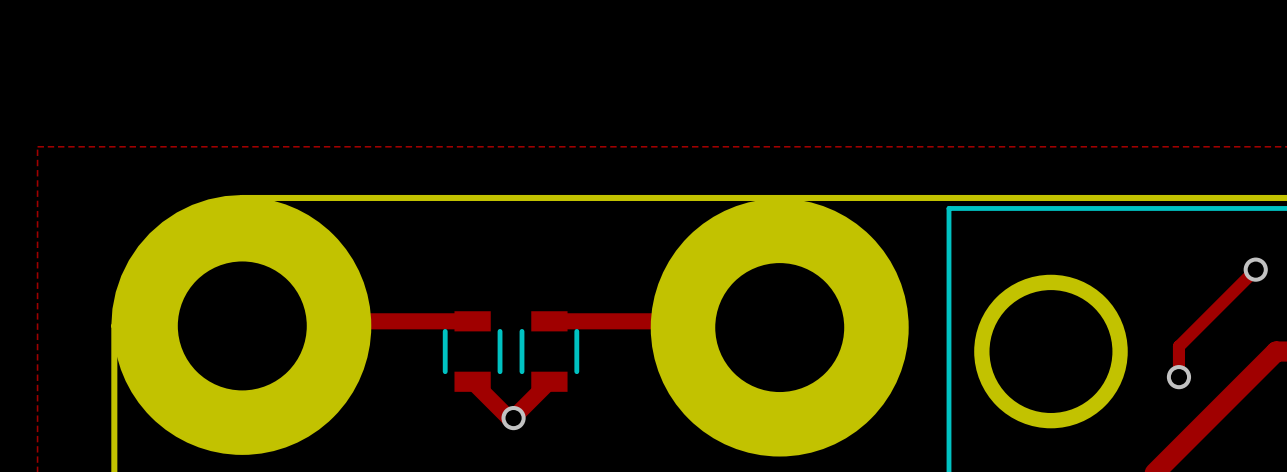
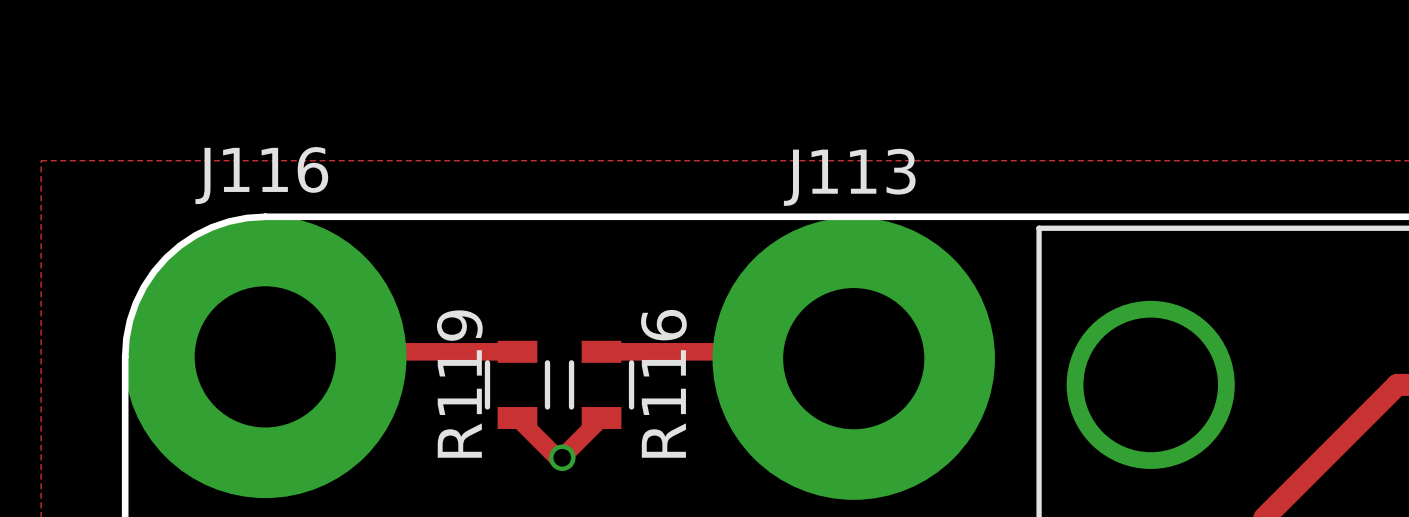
J116 name: none -> J116 (261, 175)
J113 name: none -> J113 (849, 177)
track: (1255, 269) (1178, 346) (1178, 377) -> none
via: (1255, 269) -> none
R119 name: none -> R119 (459, 384)
R116 name: none -> R116 (663, 383)
via: (1178, 377) -> none

